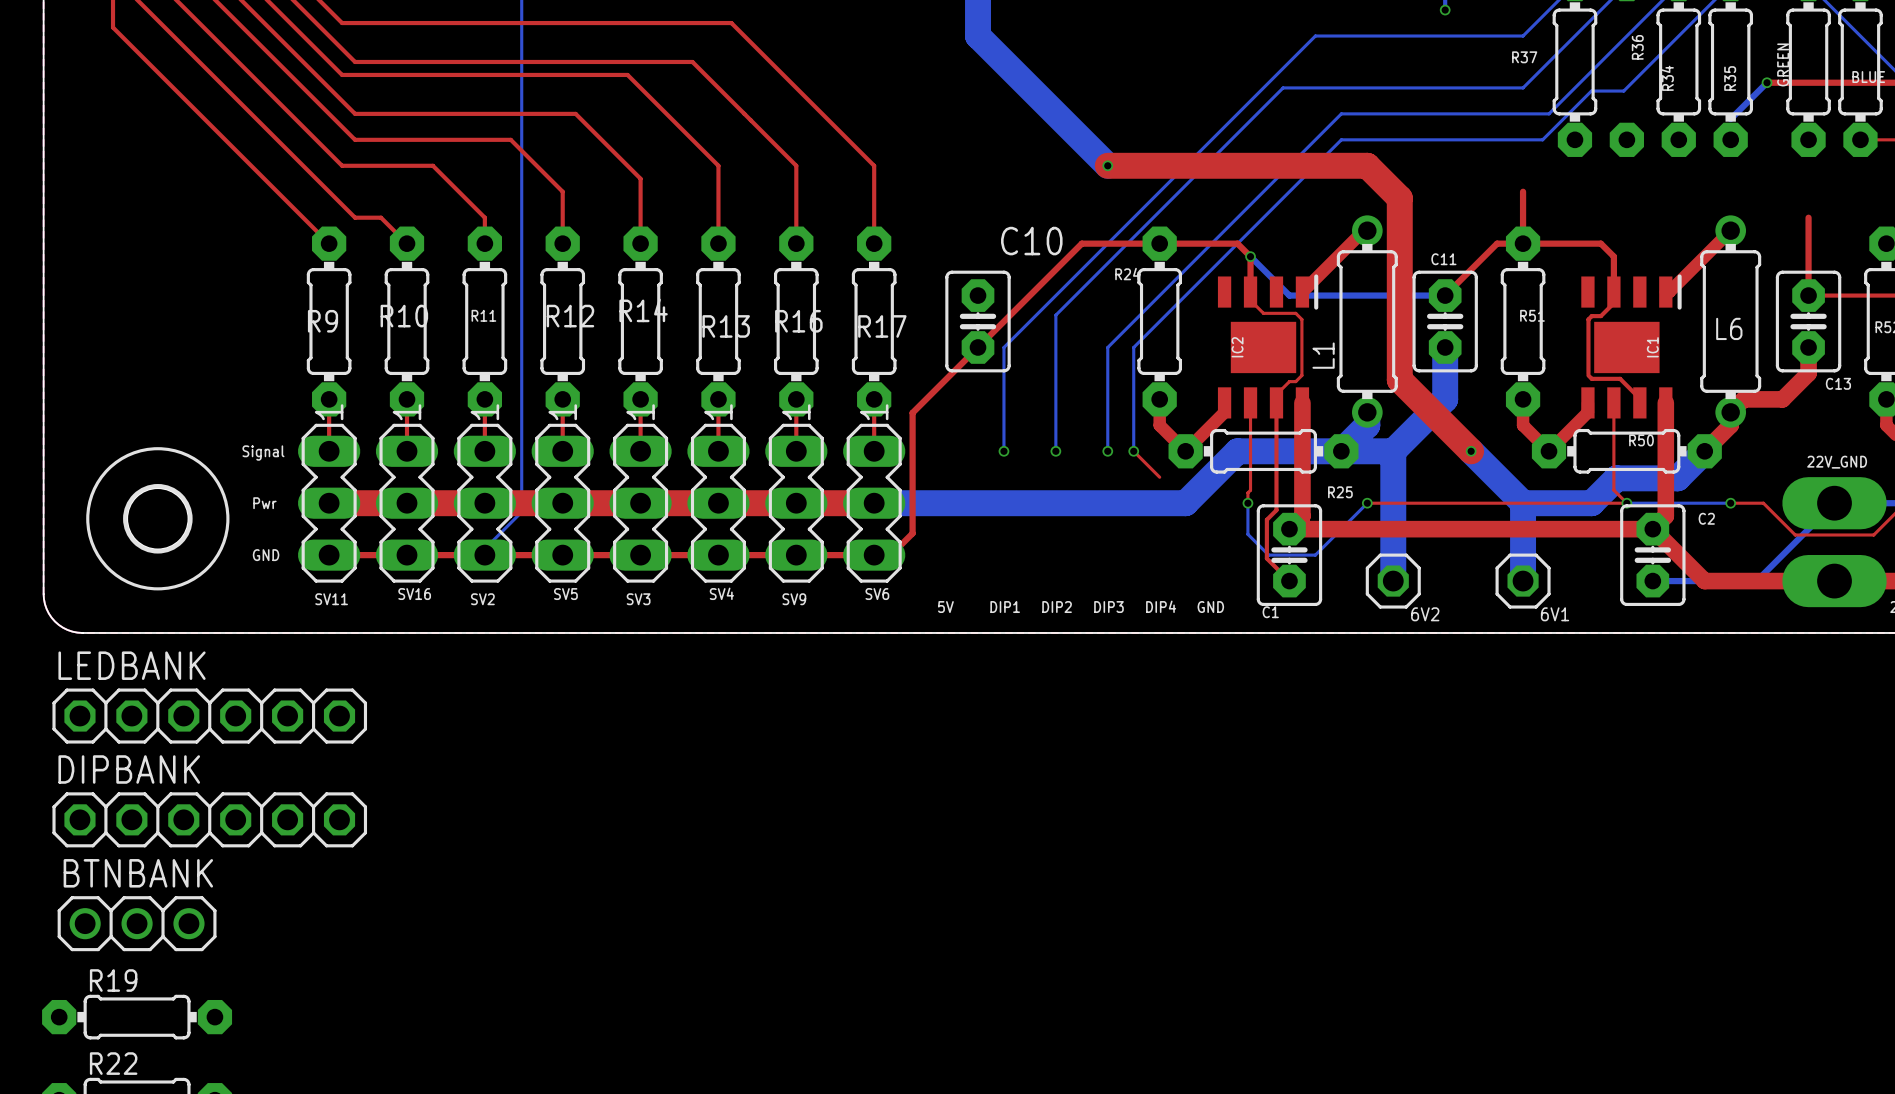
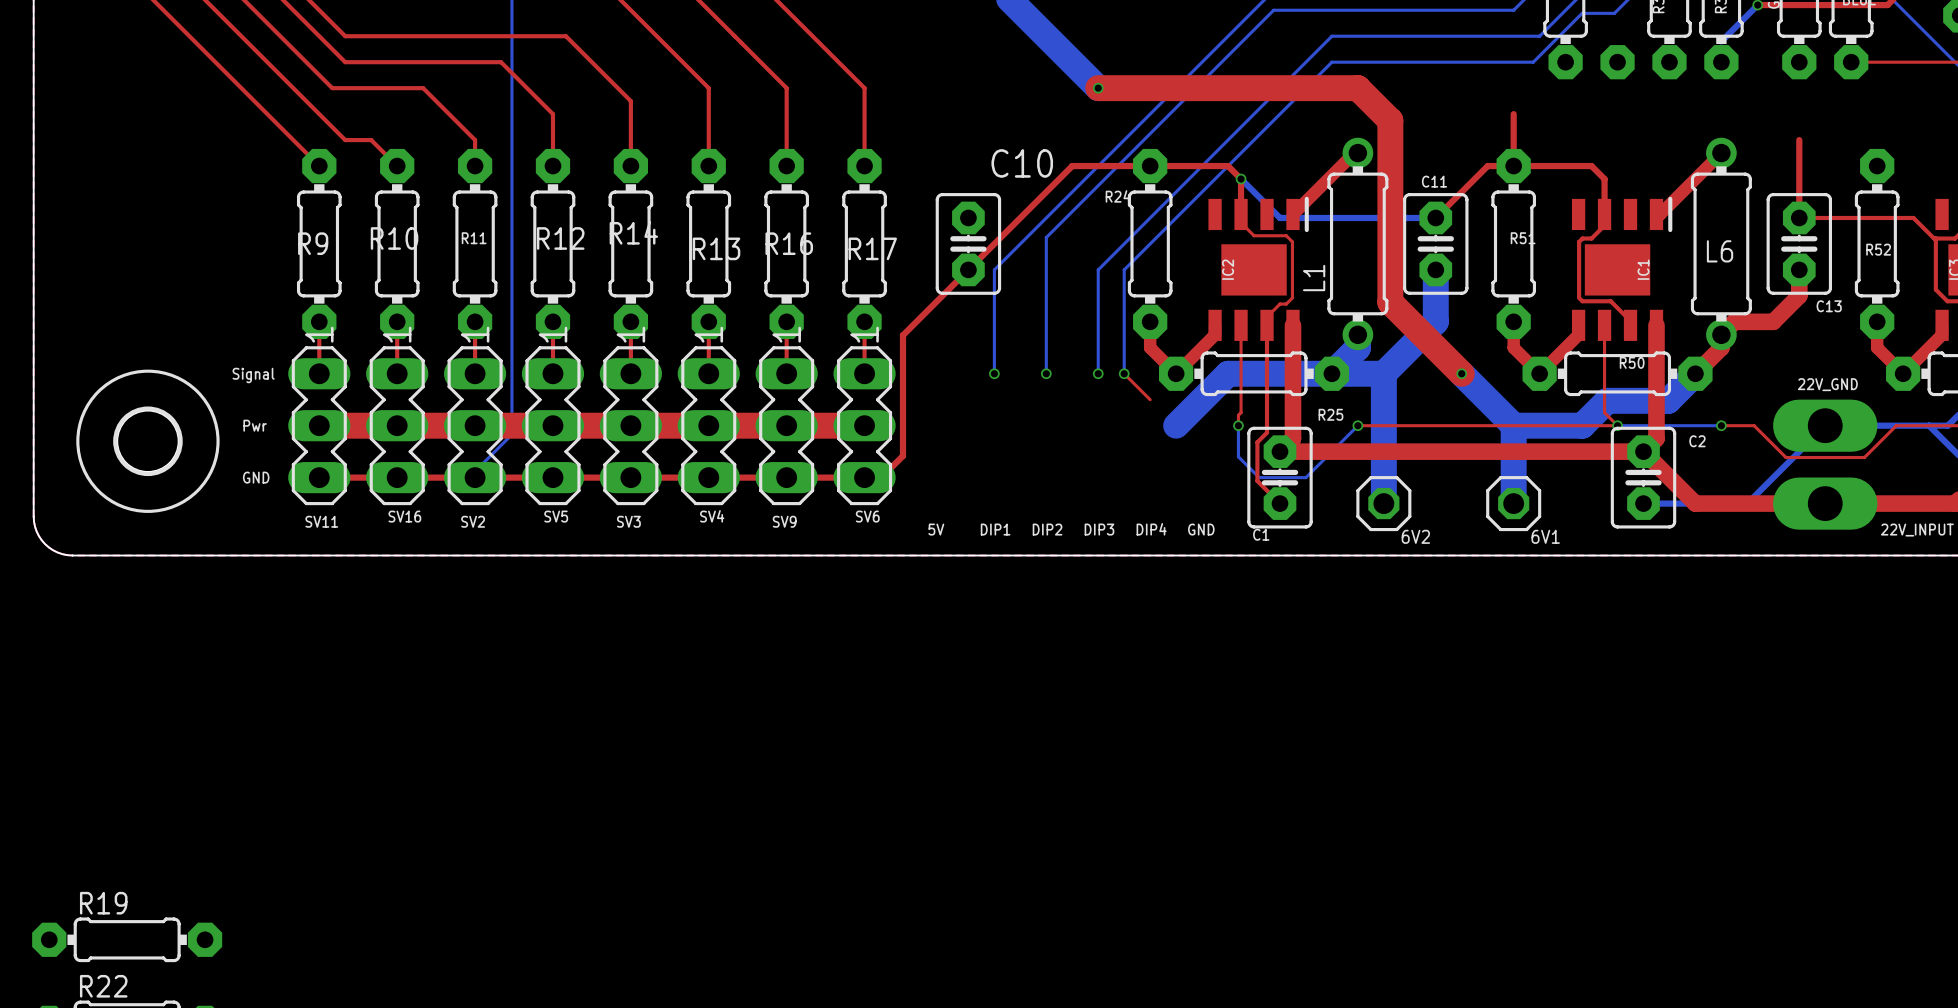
bottom track: (874, 503) (1185, 503) -> none
LEDBANK: (209, 716) -> none
DIPBANK: (209, 819) -> none
BTNBANK: (137, 923) -> none

